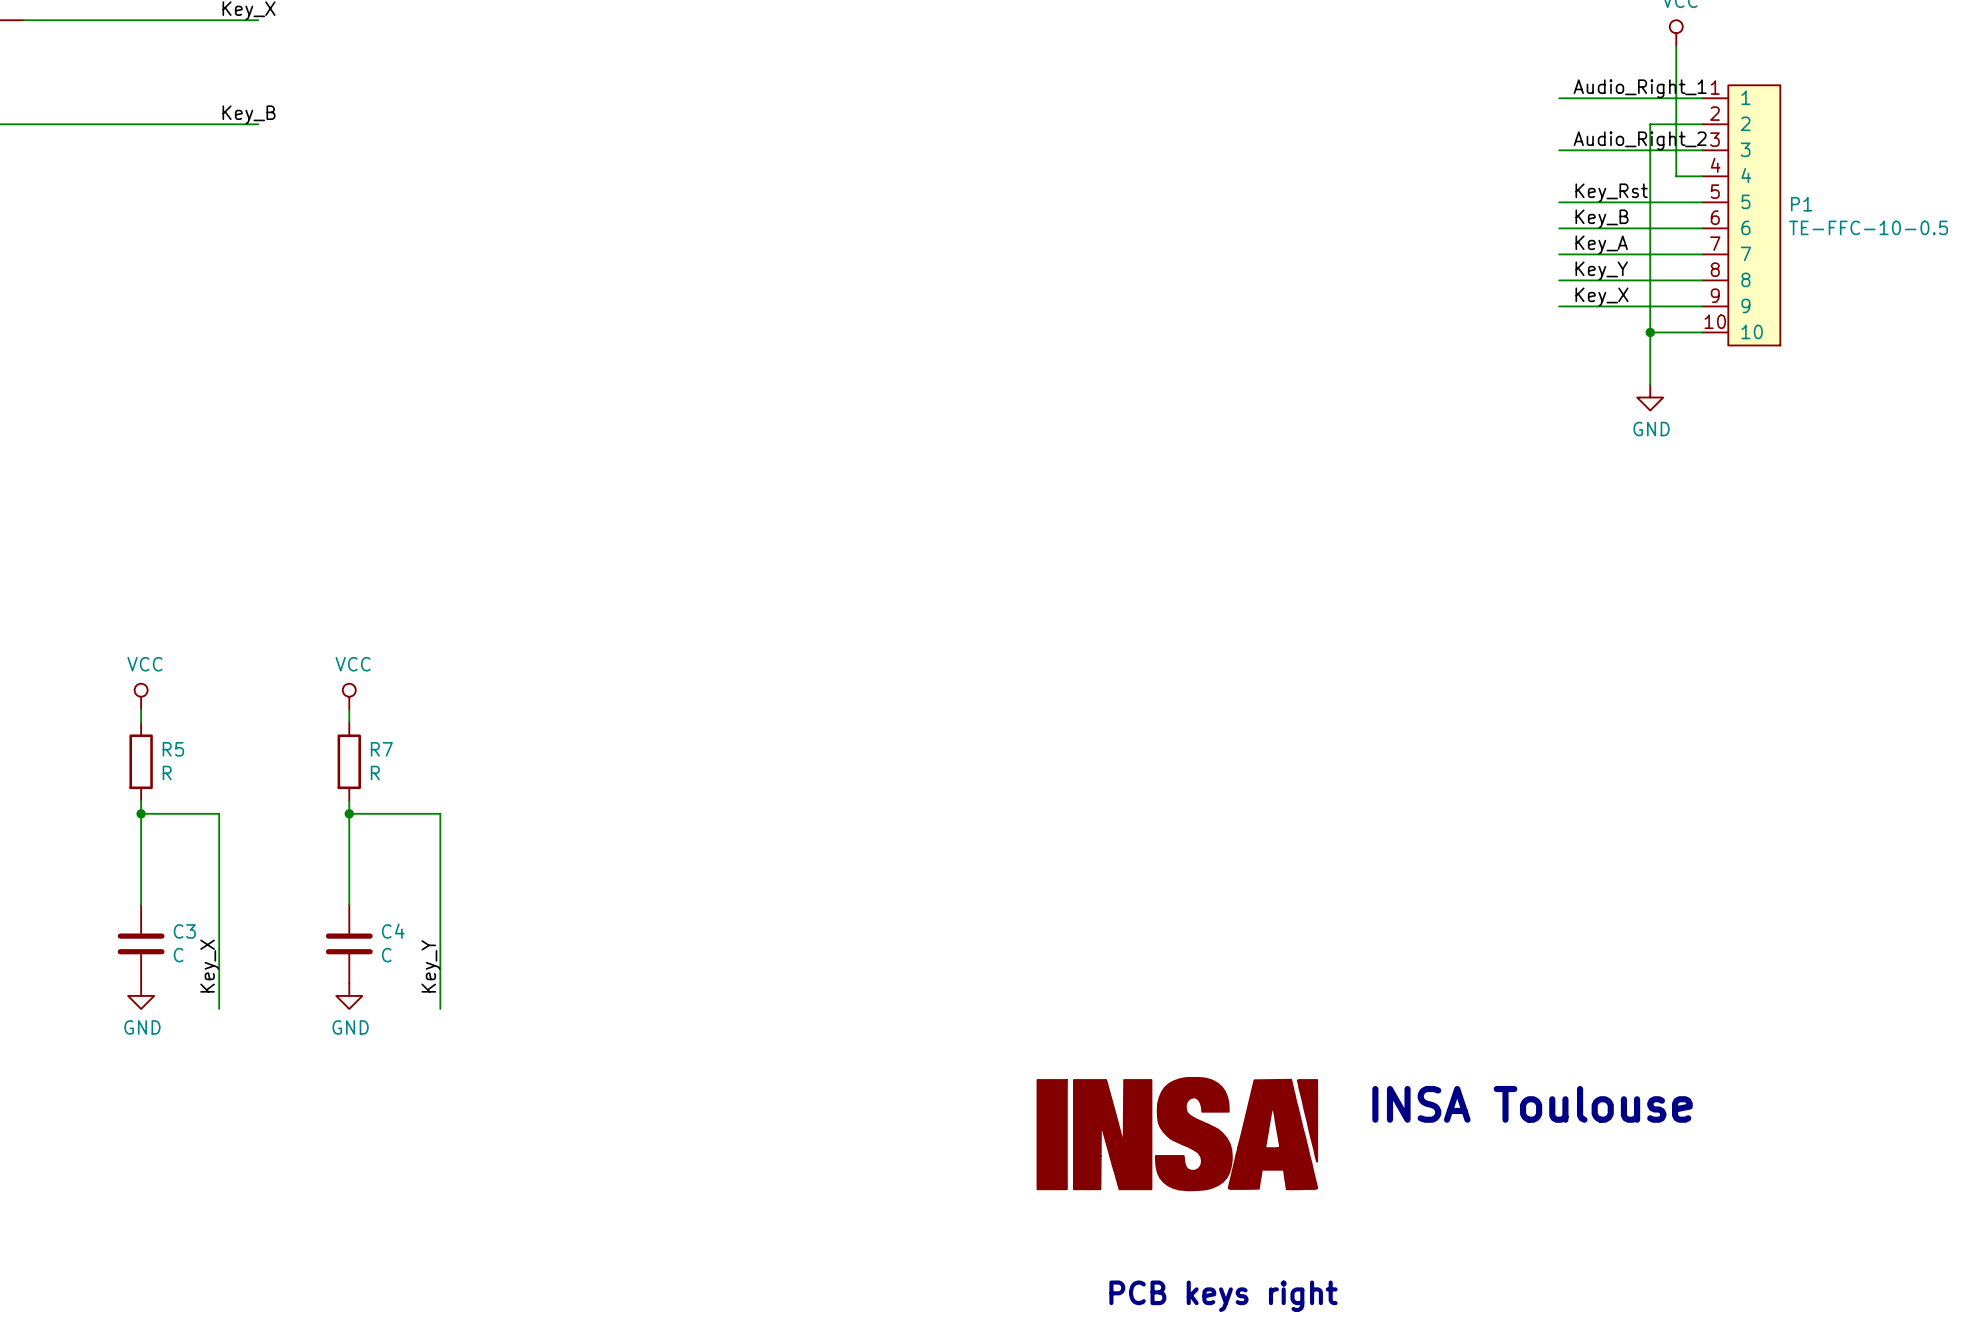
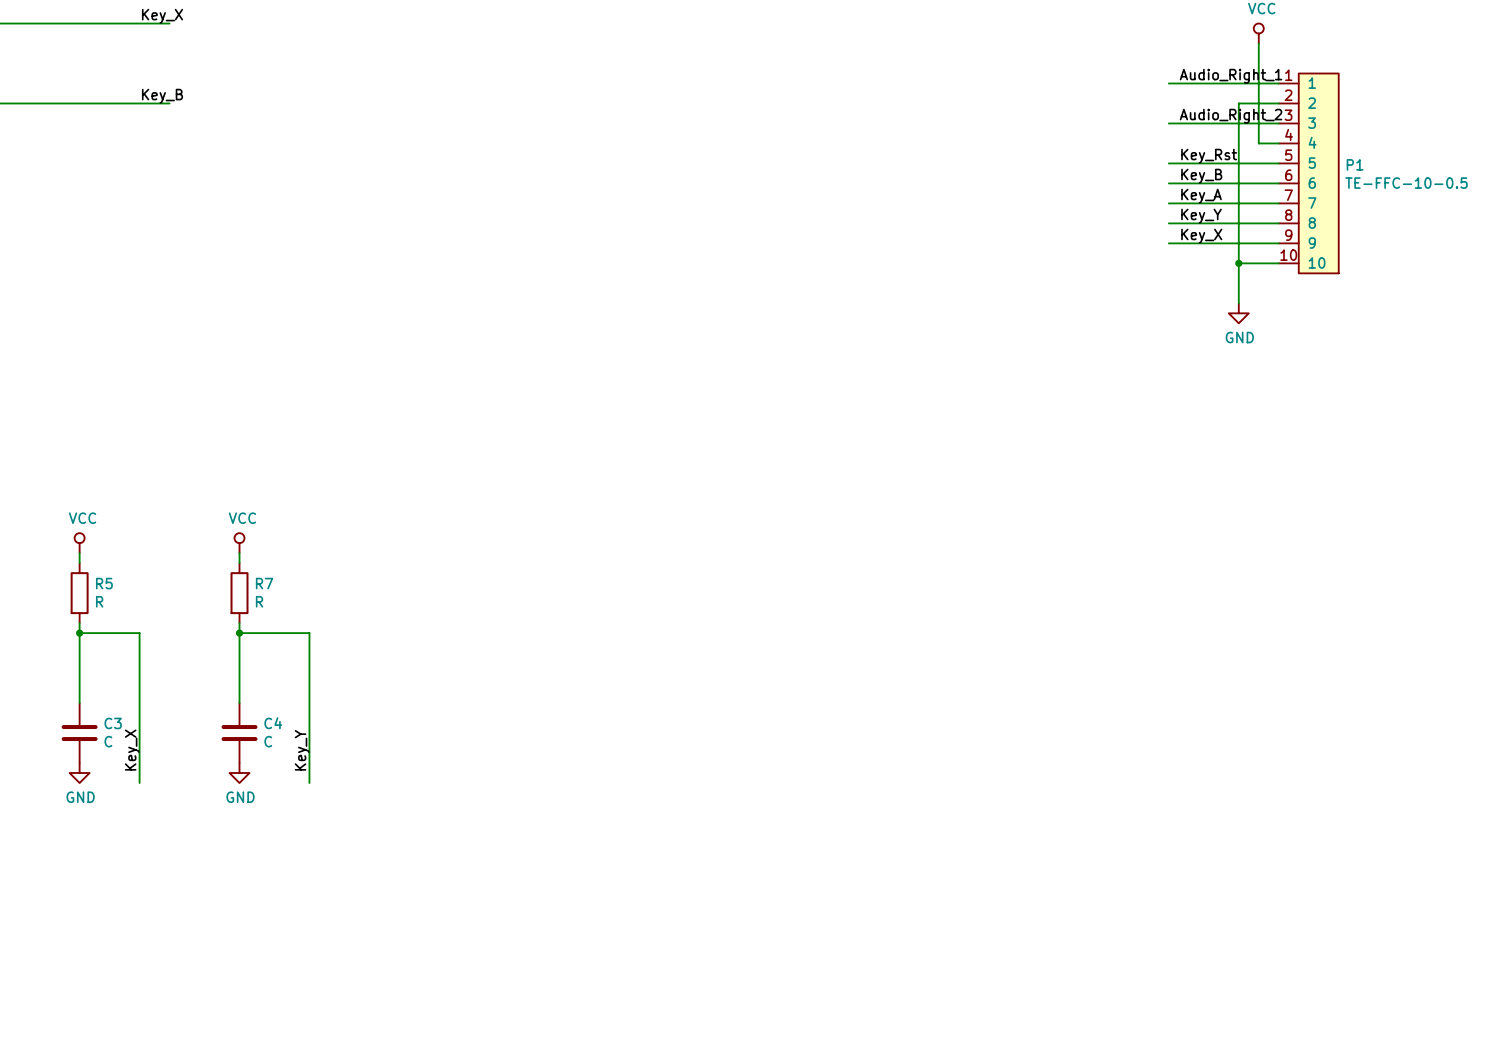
text: INSA Toulouse (1532, 1104) -> none
part: (1177, 1134) -> none
text: PCB keys right (1223, 1296) -> none

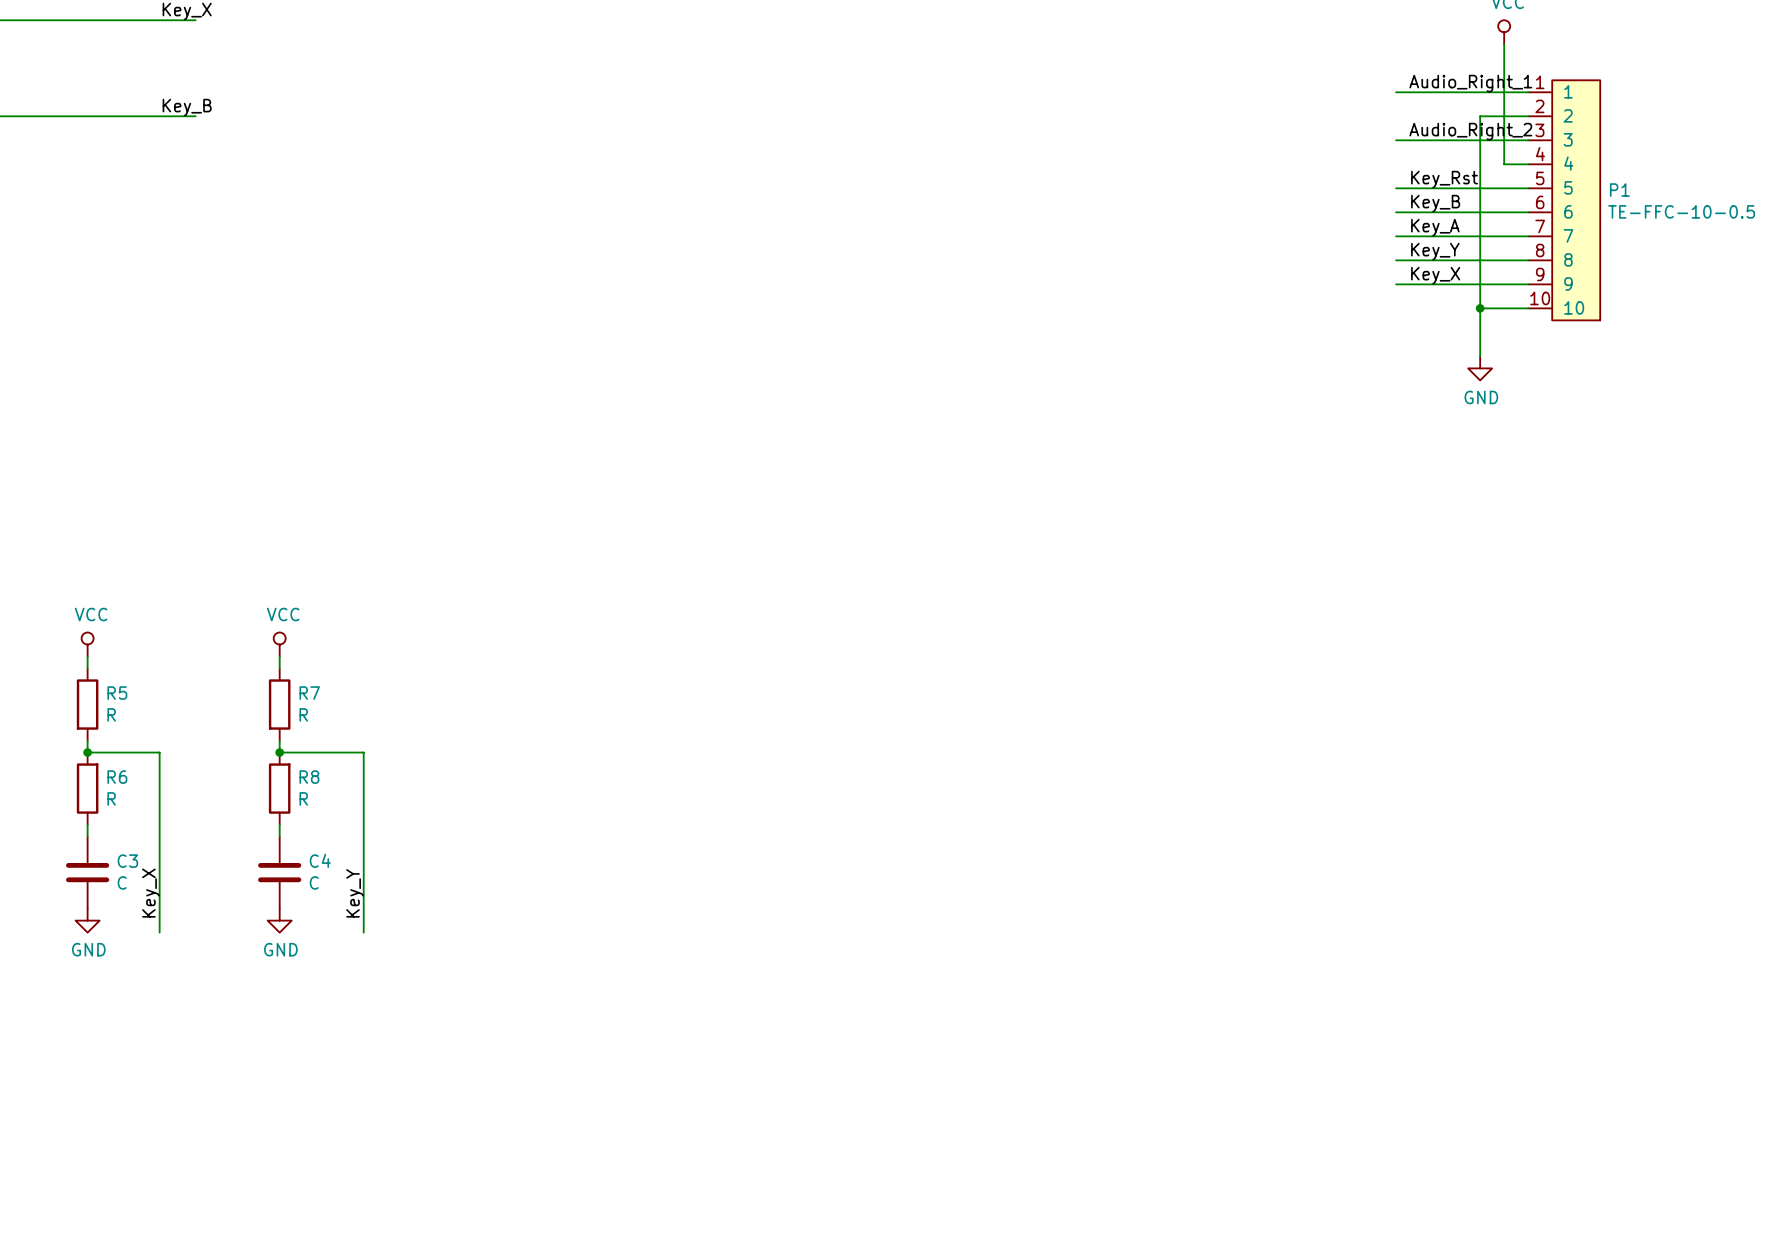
wire: (79, 633) (79, 693) -> none
wire: (239, 633) (239, 693) -> none
R6: none -> R (87, 788)
R8: none -> R (279, 788)

